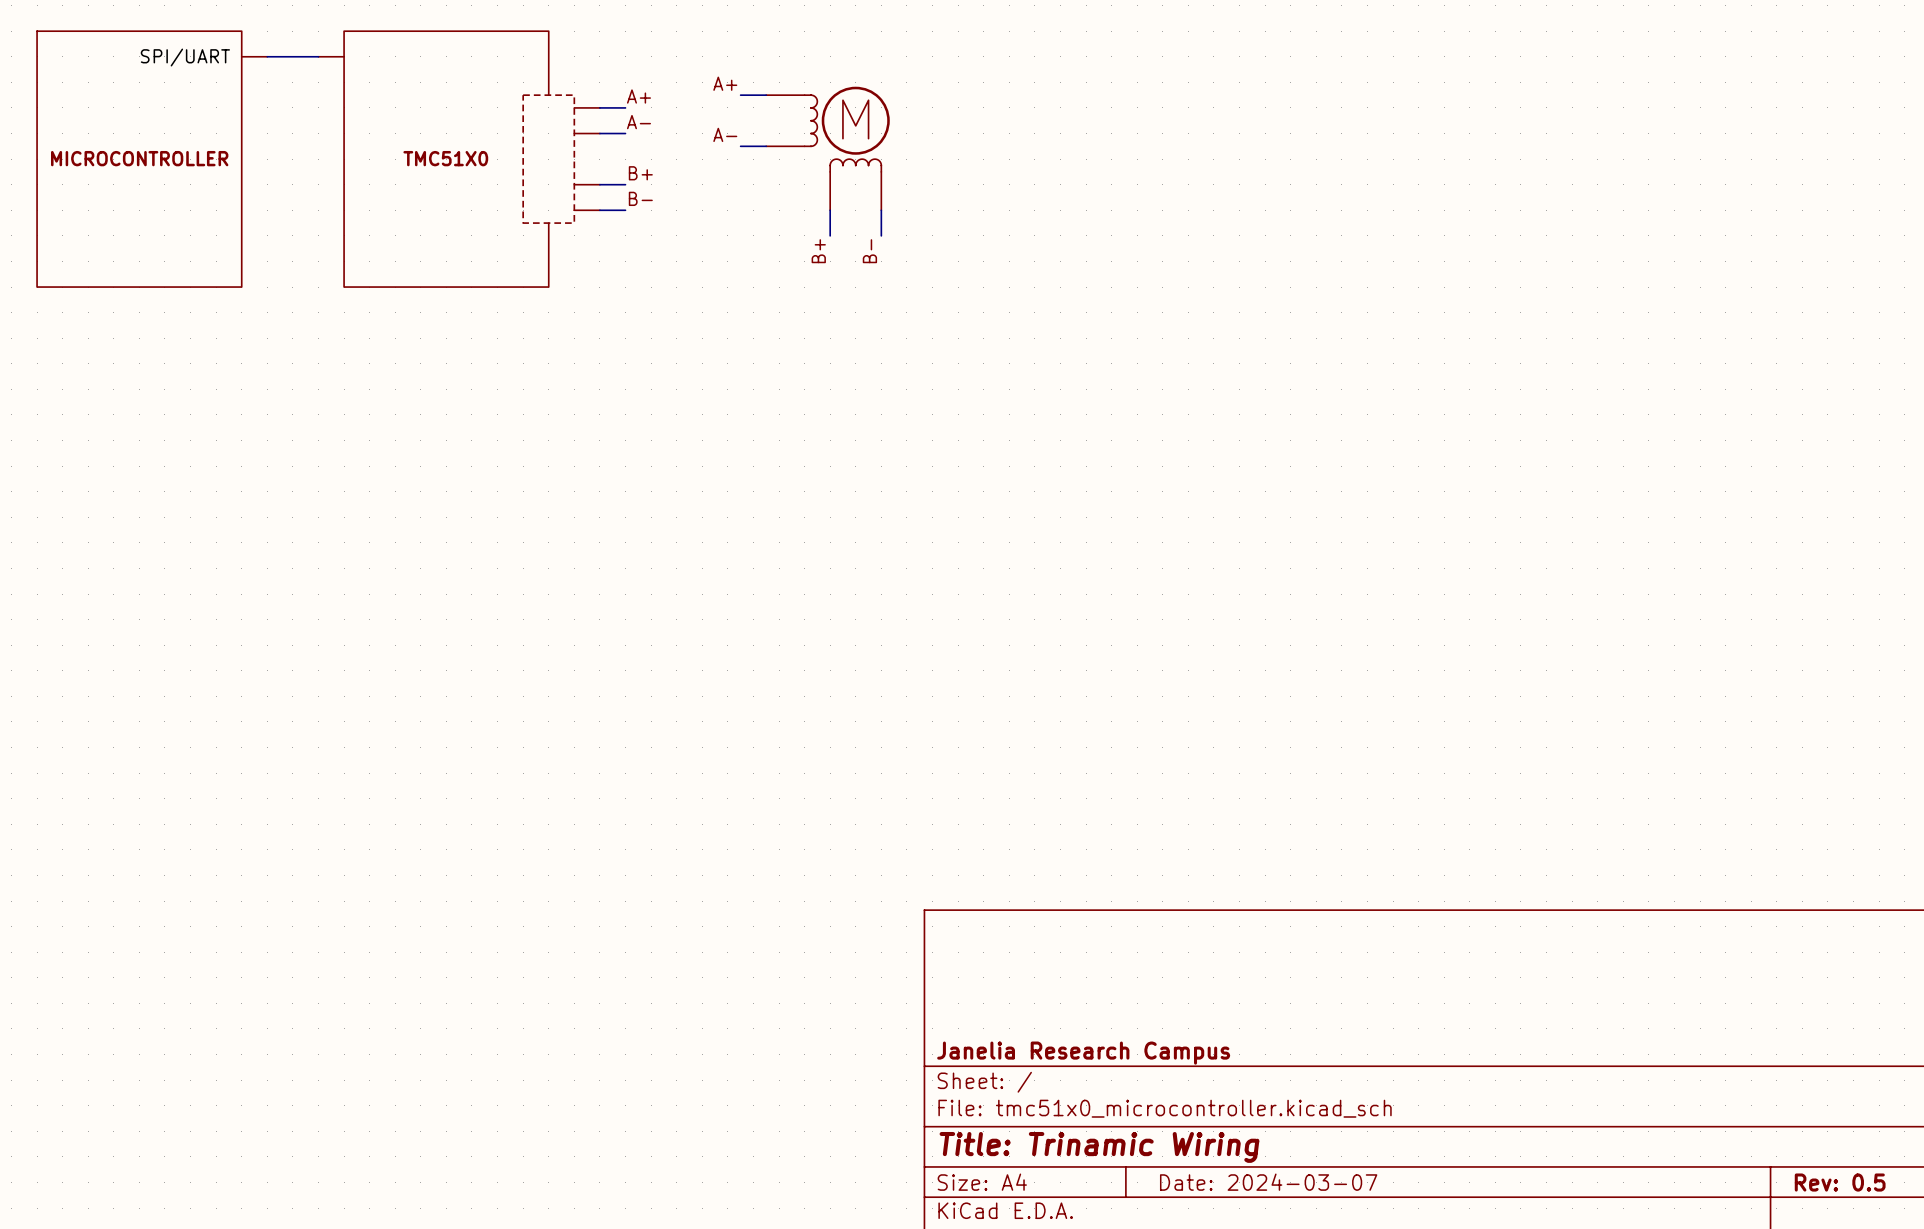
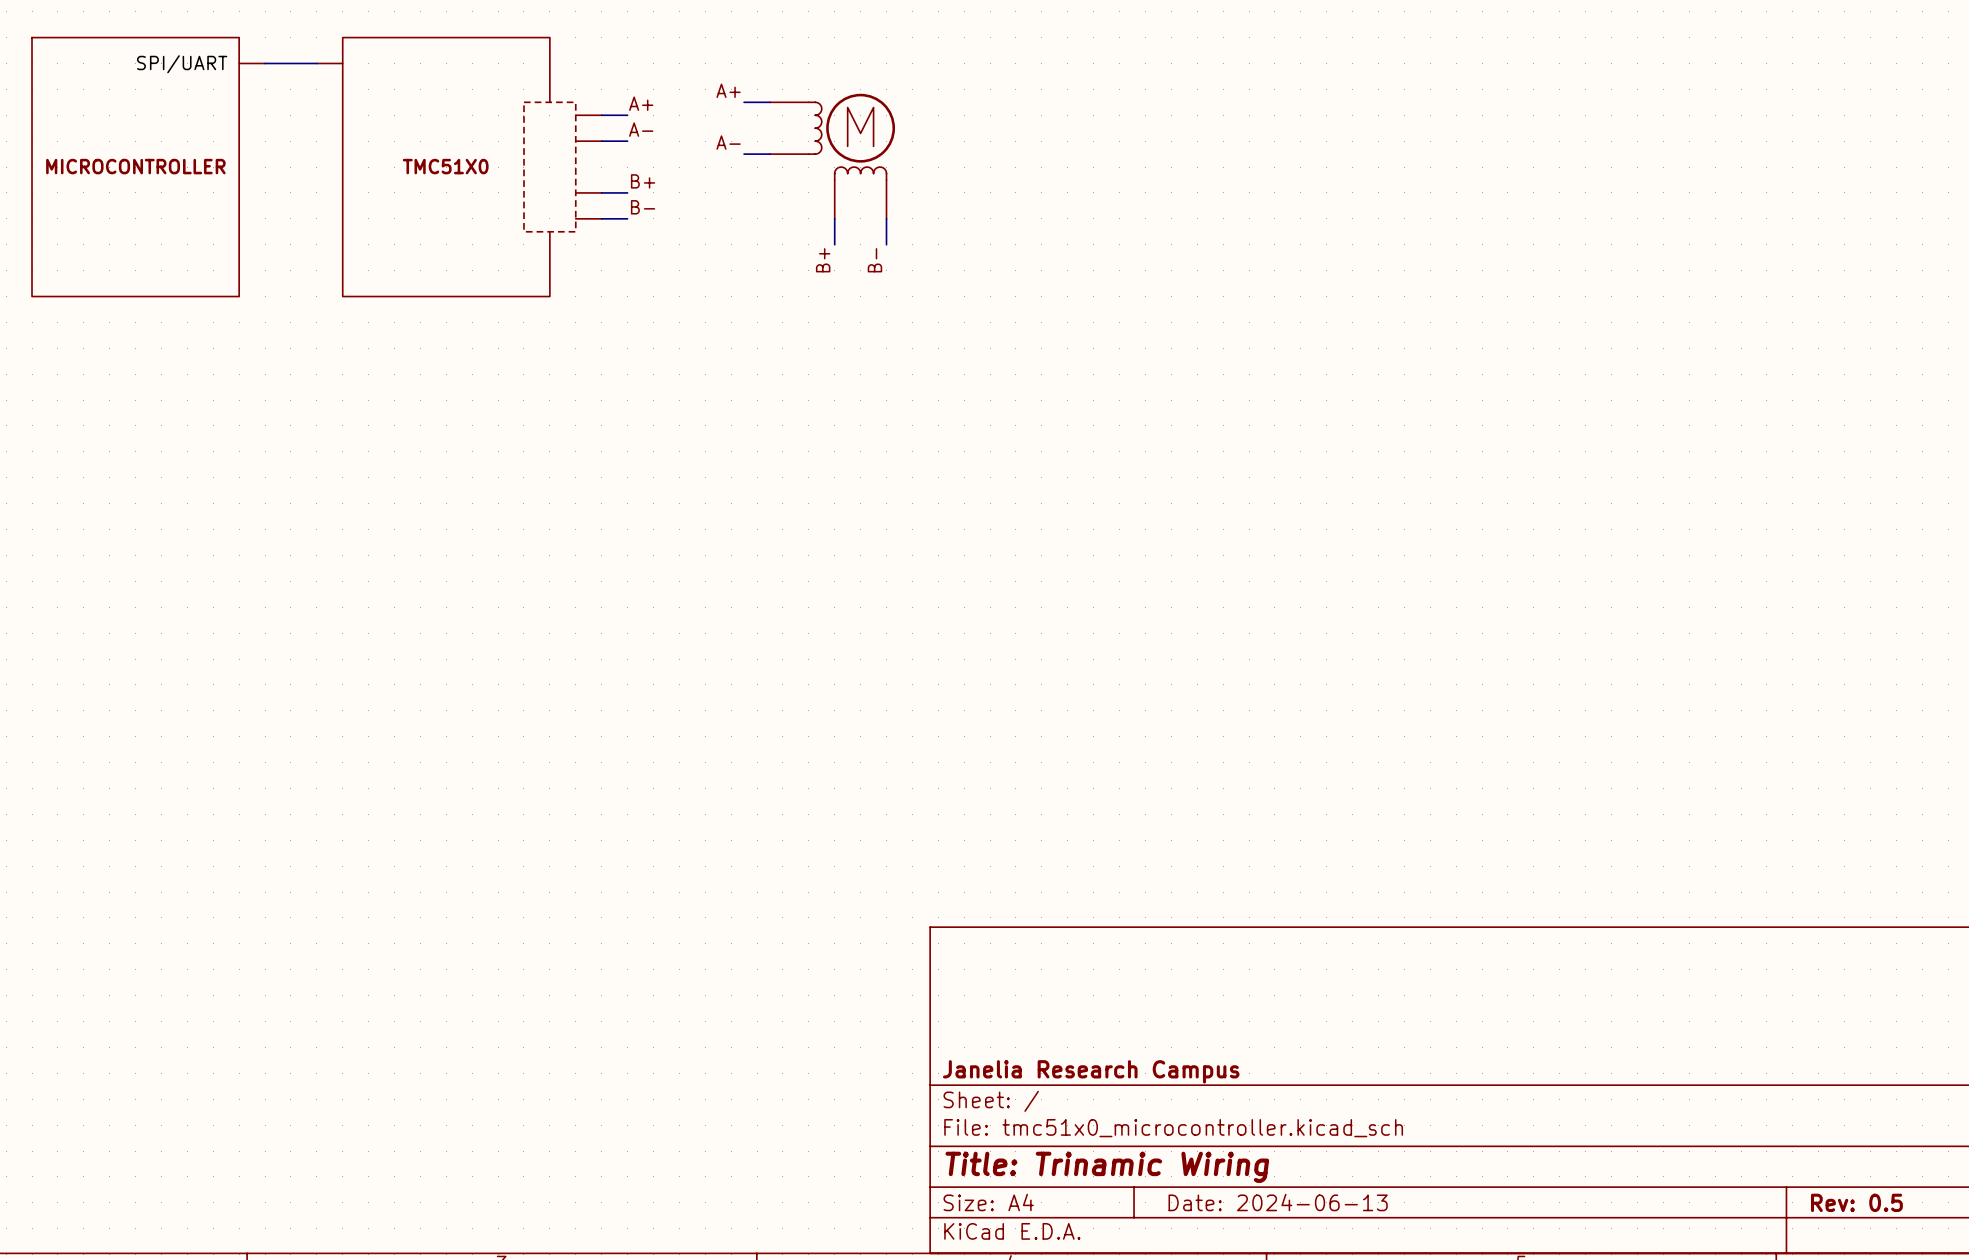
title block: Date: 2024-03-07 (1268, 1182) -> Date: 2024-06-13 (1278, 1202)

